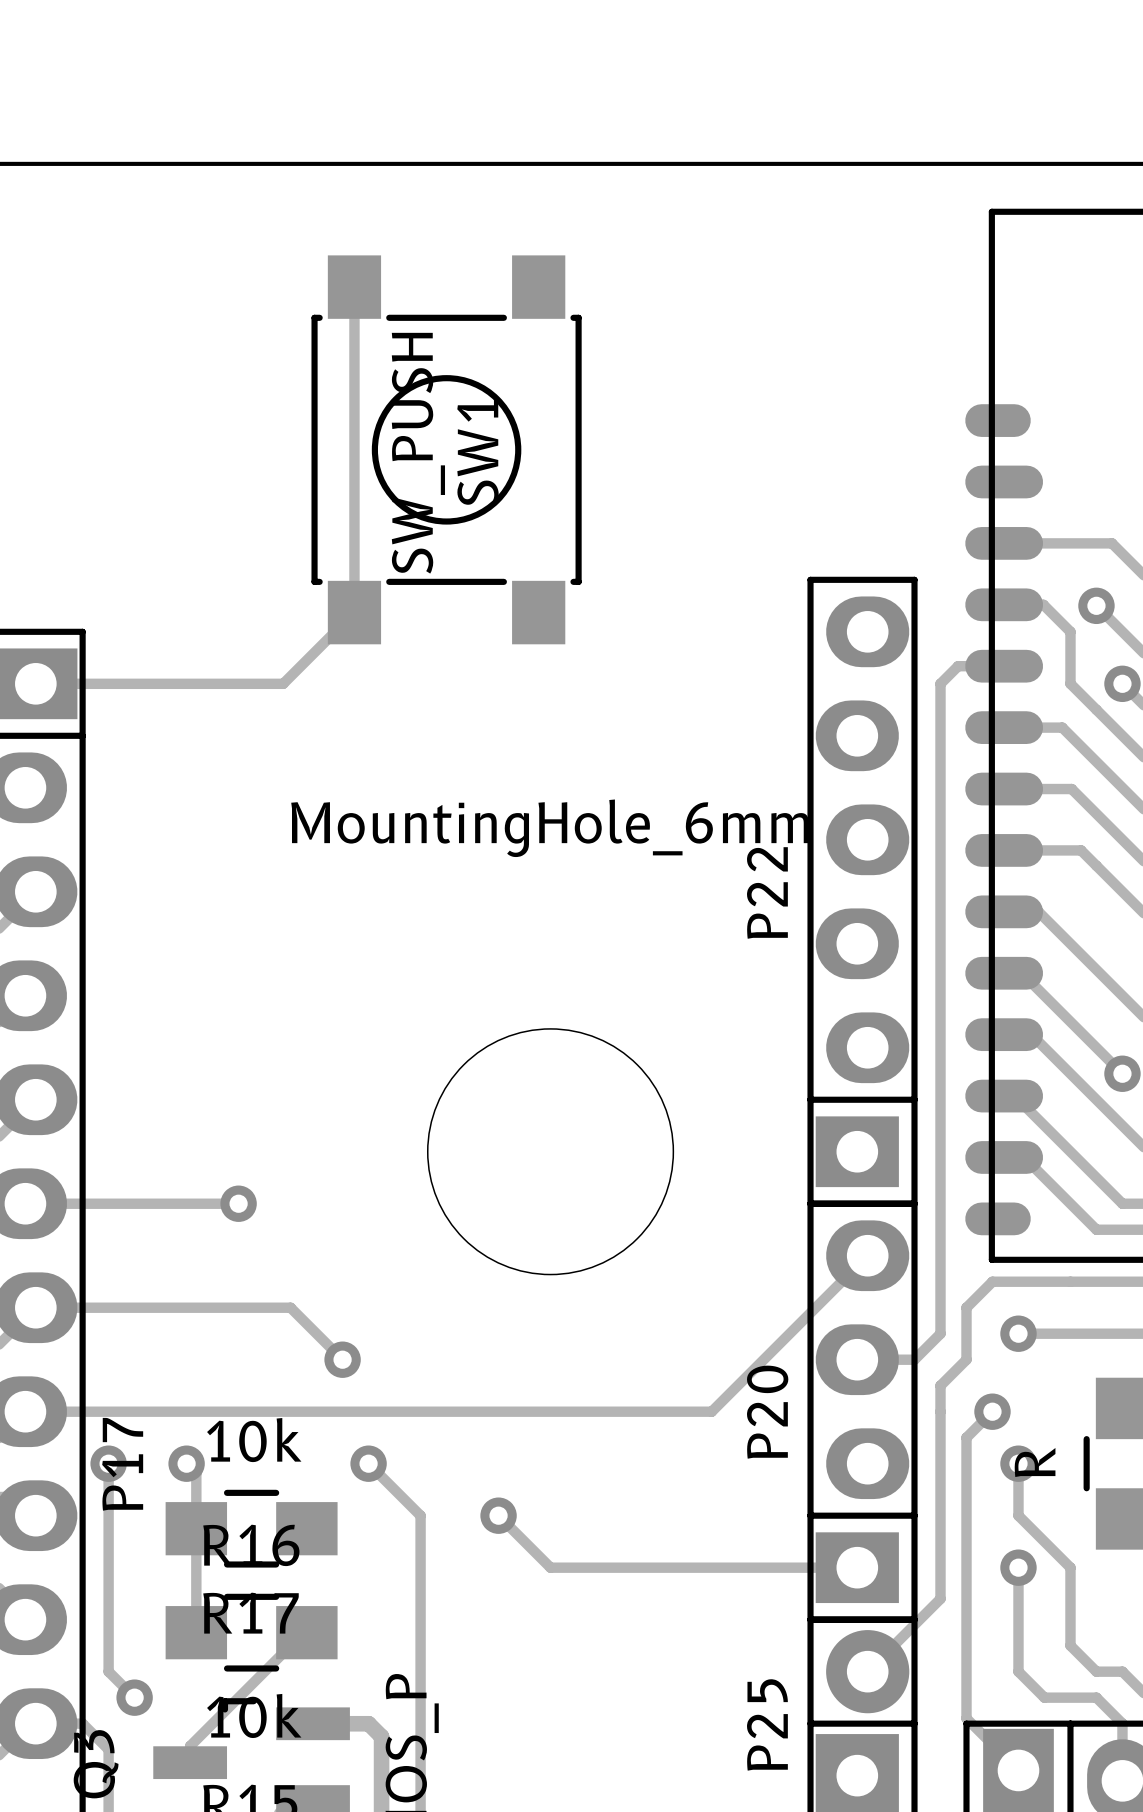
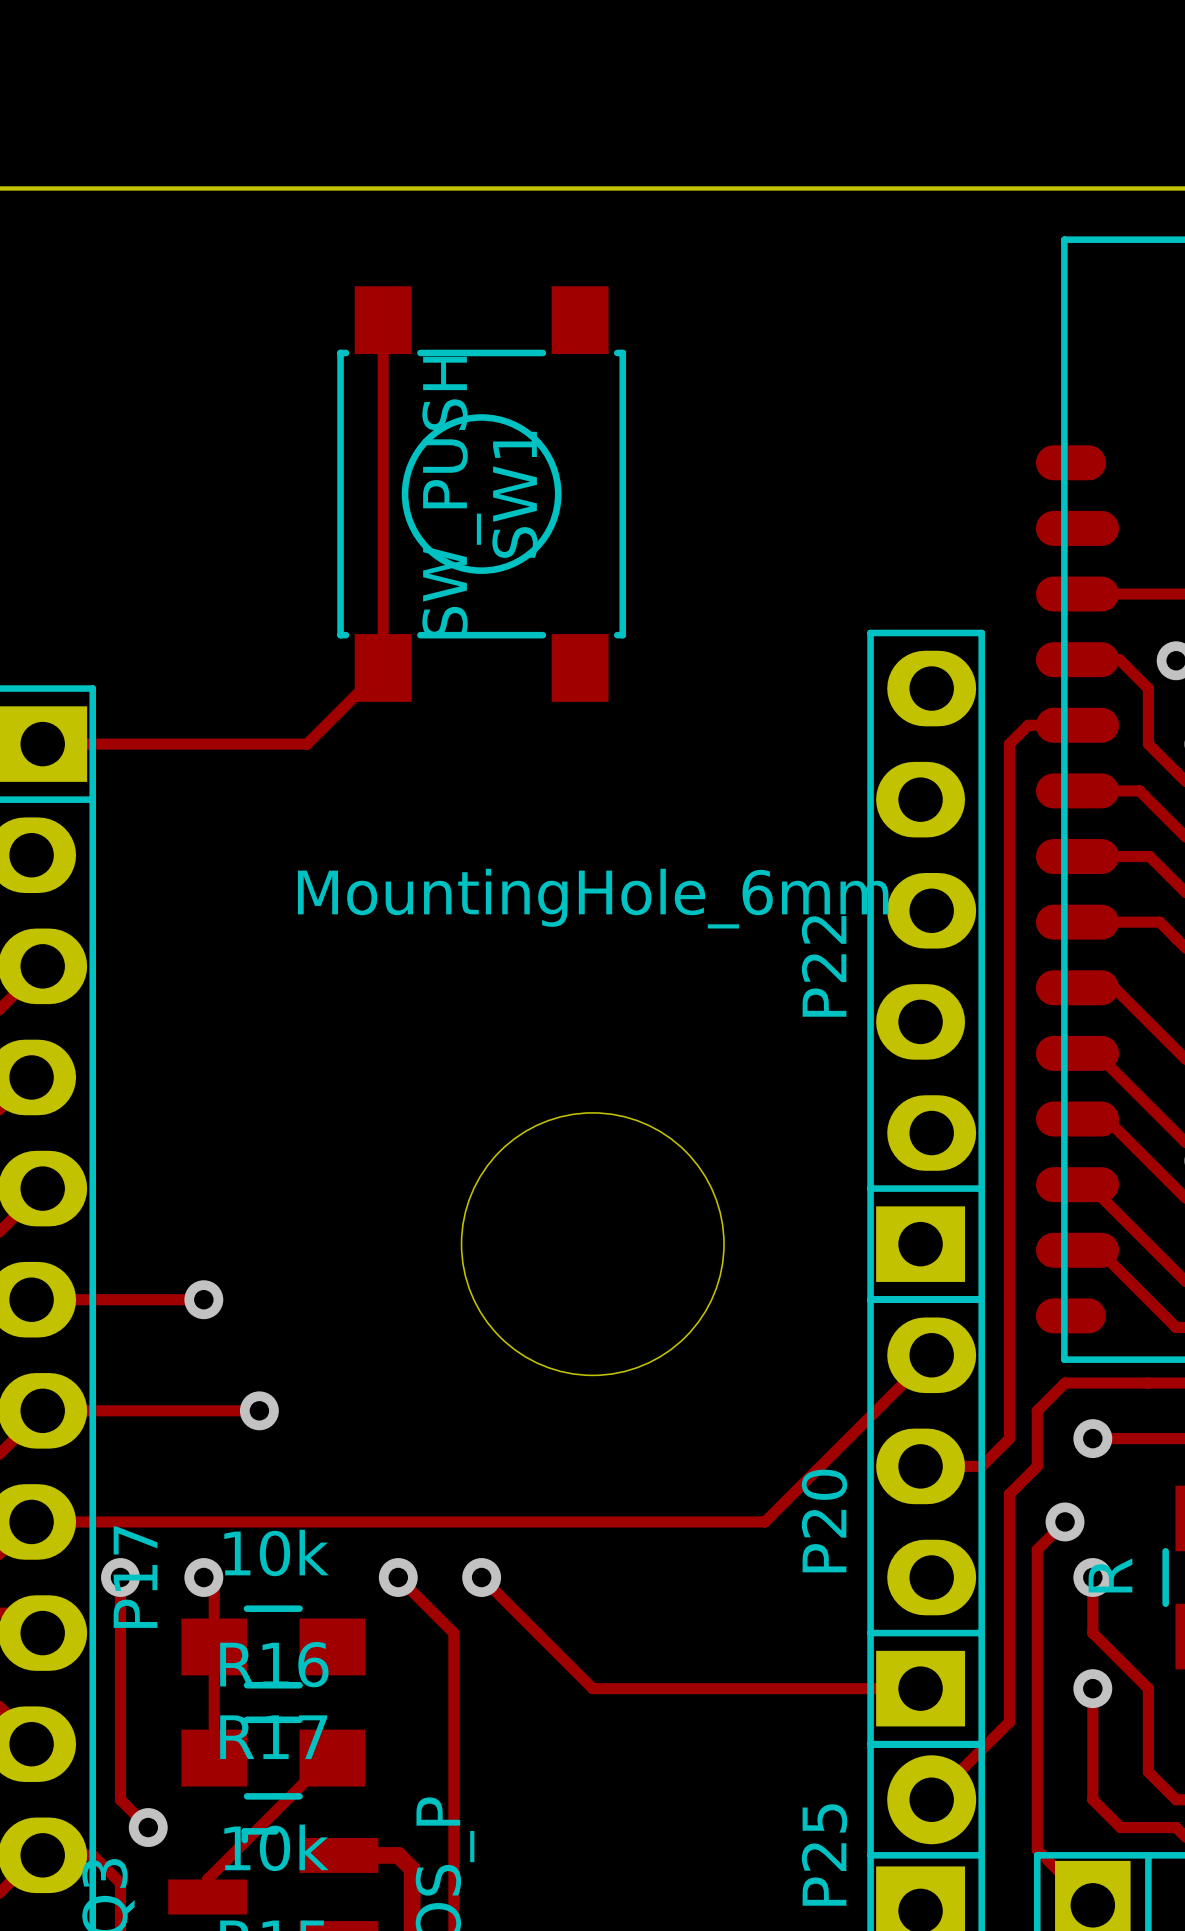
track: (186, 1203) (238, 1203) -> none
via: none -> (203, 1299)
via: (238, 1203) -> none
track: (238, 1307) (290, 1307) (342, 1359) -> none
via: none -> (259, 1410)
via: (342, 1359) -> none
track: none -> (481, 1577) (537, 1633)
via: none -> (481, 1577)
via: (498, 1515) -> none

